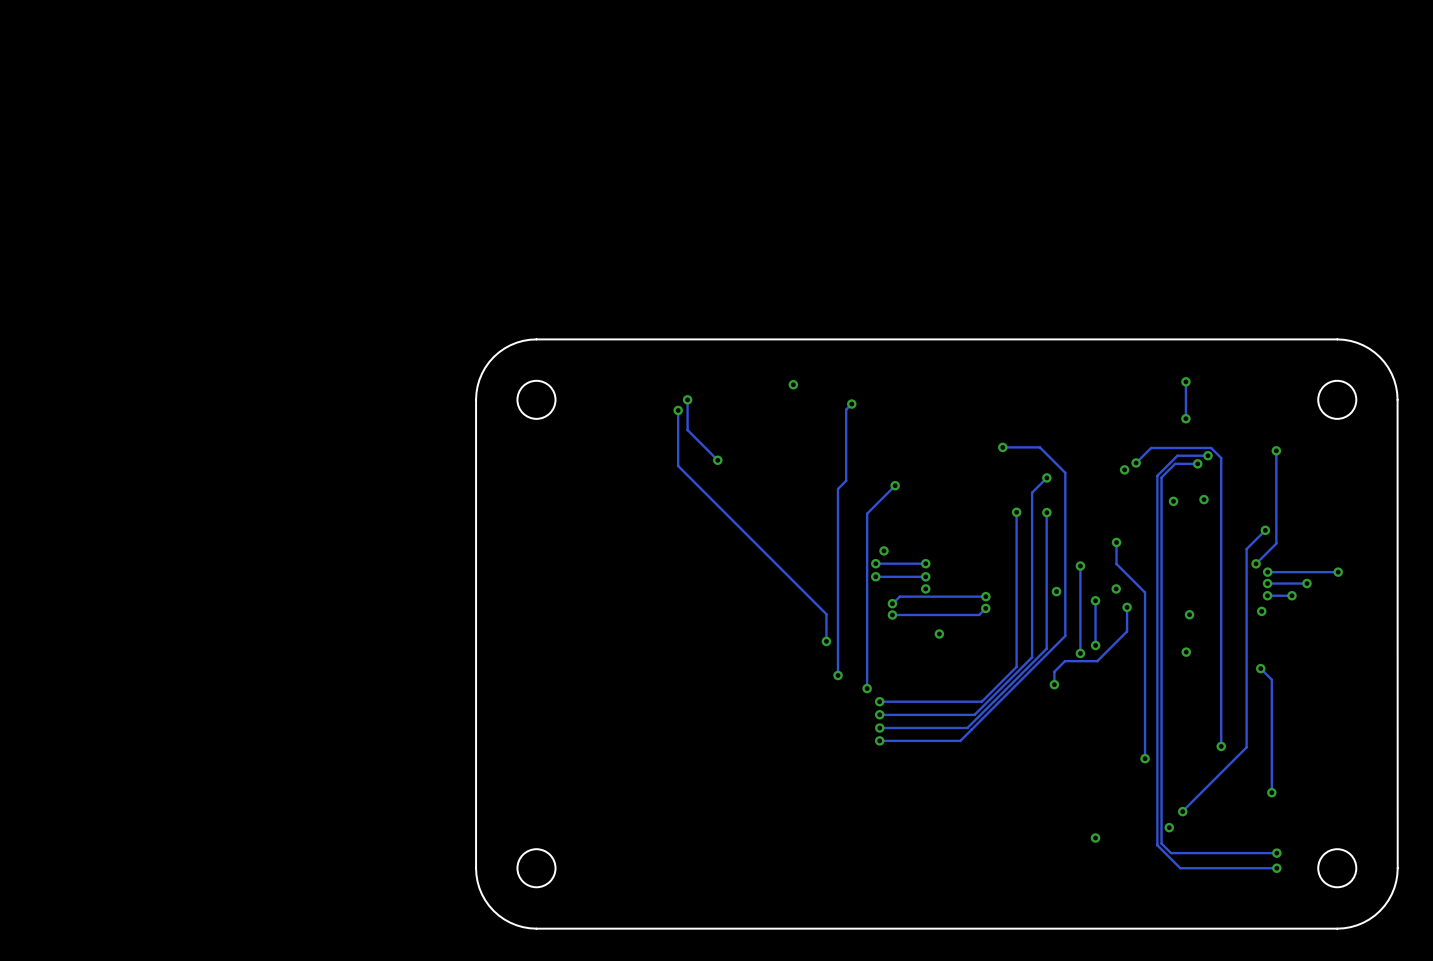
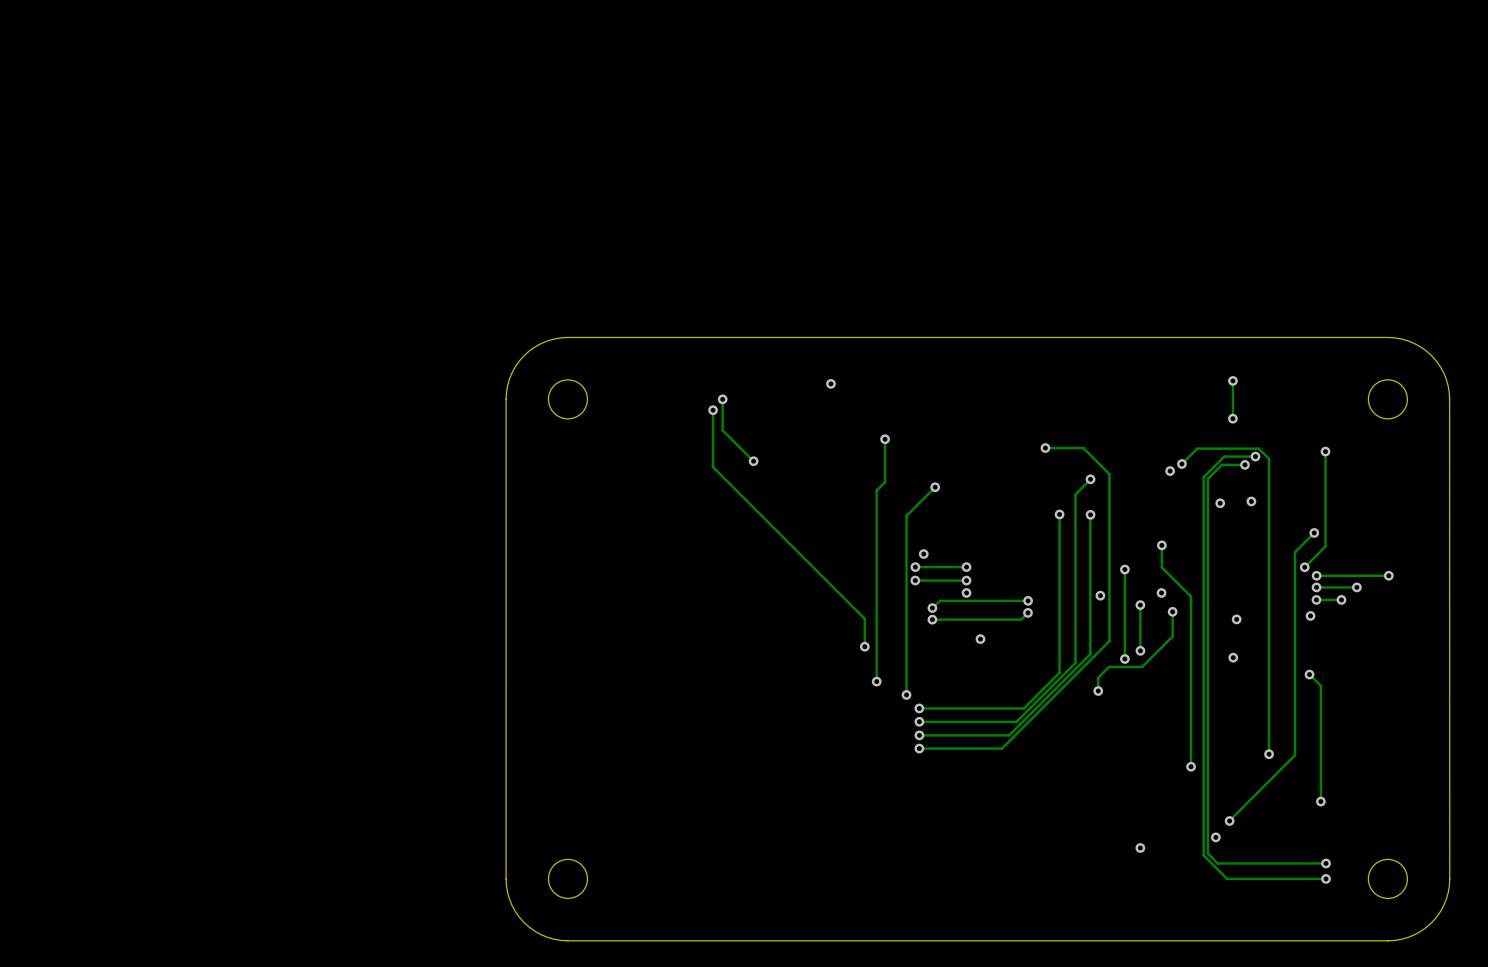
track: (851, 404) (846, 409) (846, 438) -> none
via position: (851, 404) -> (885, 439)

